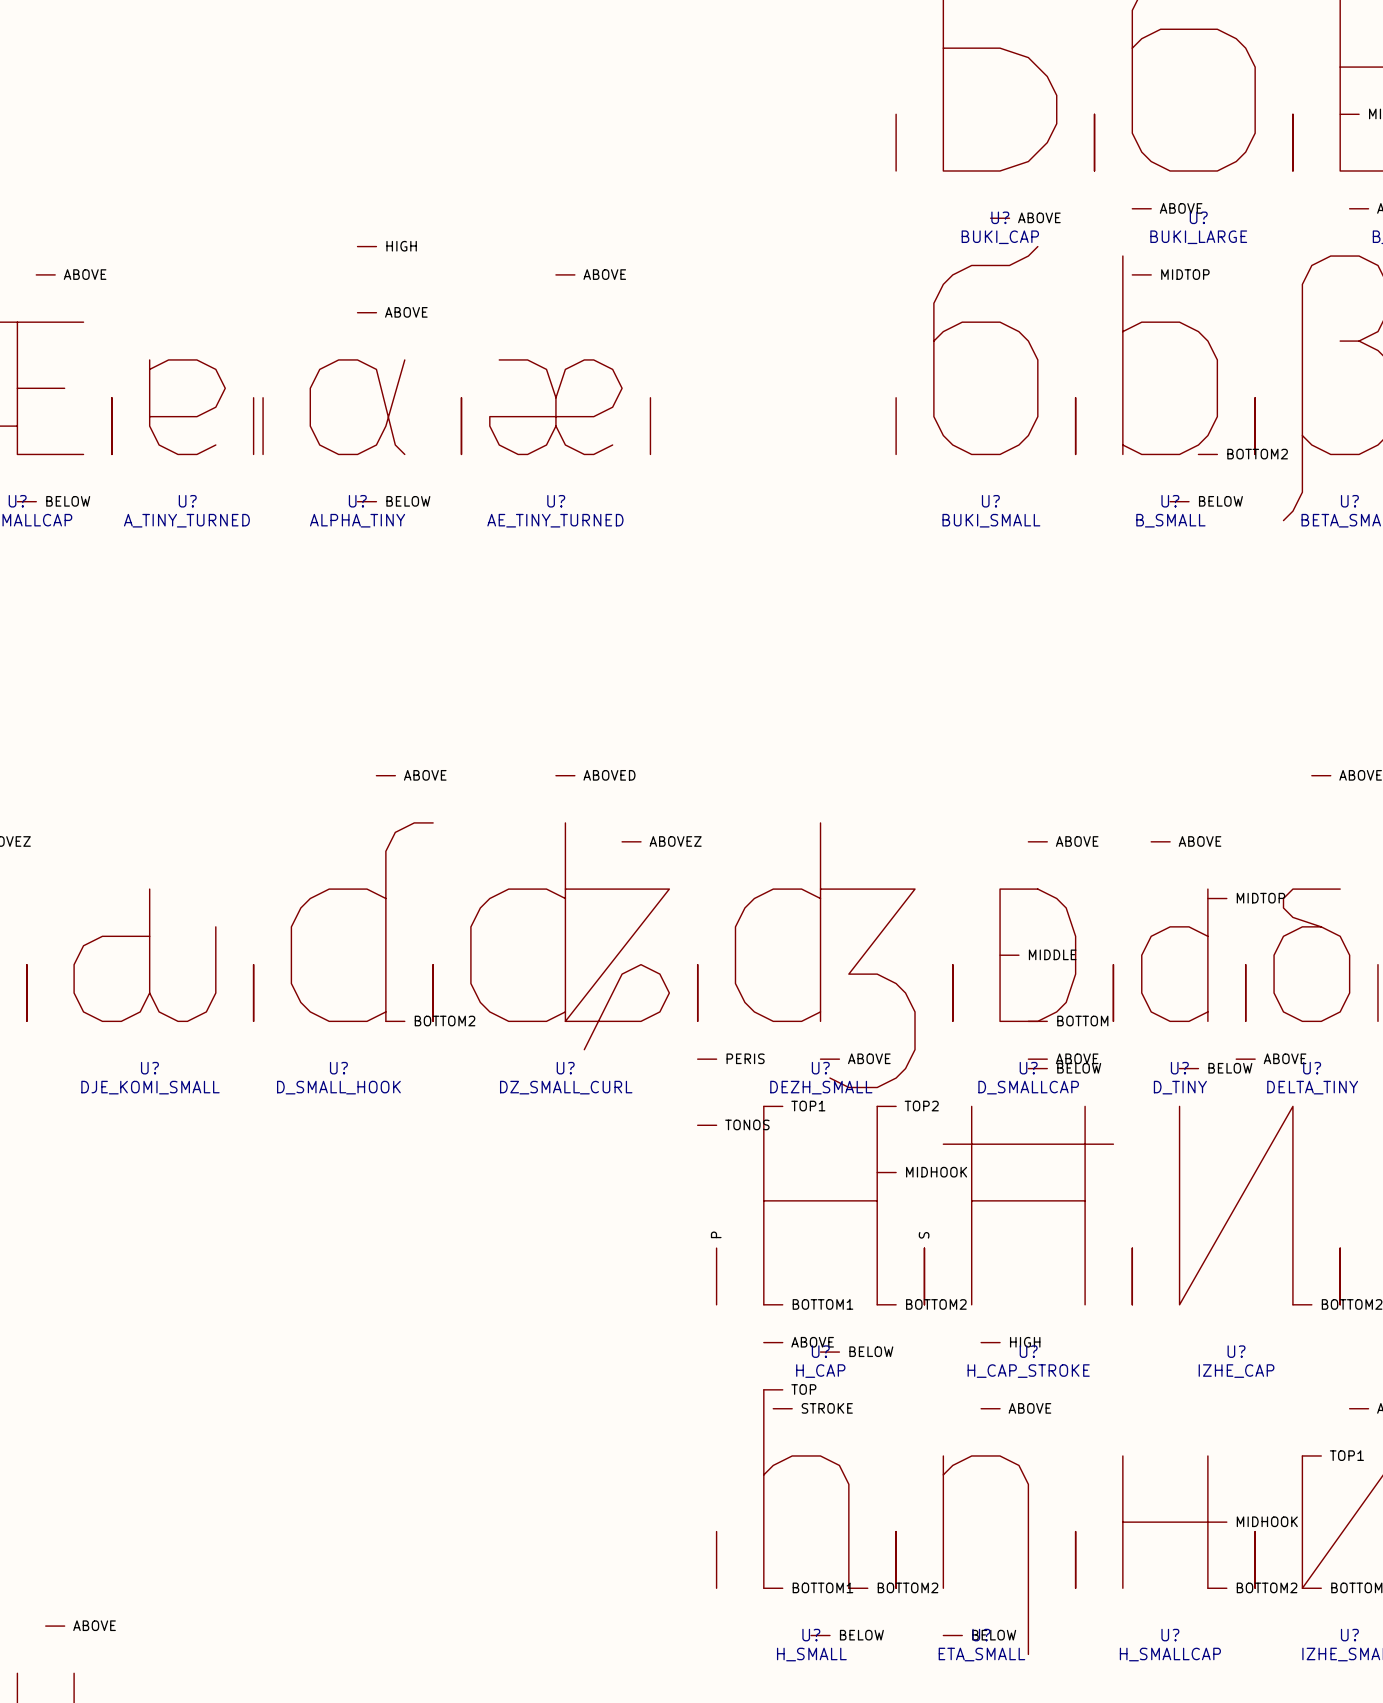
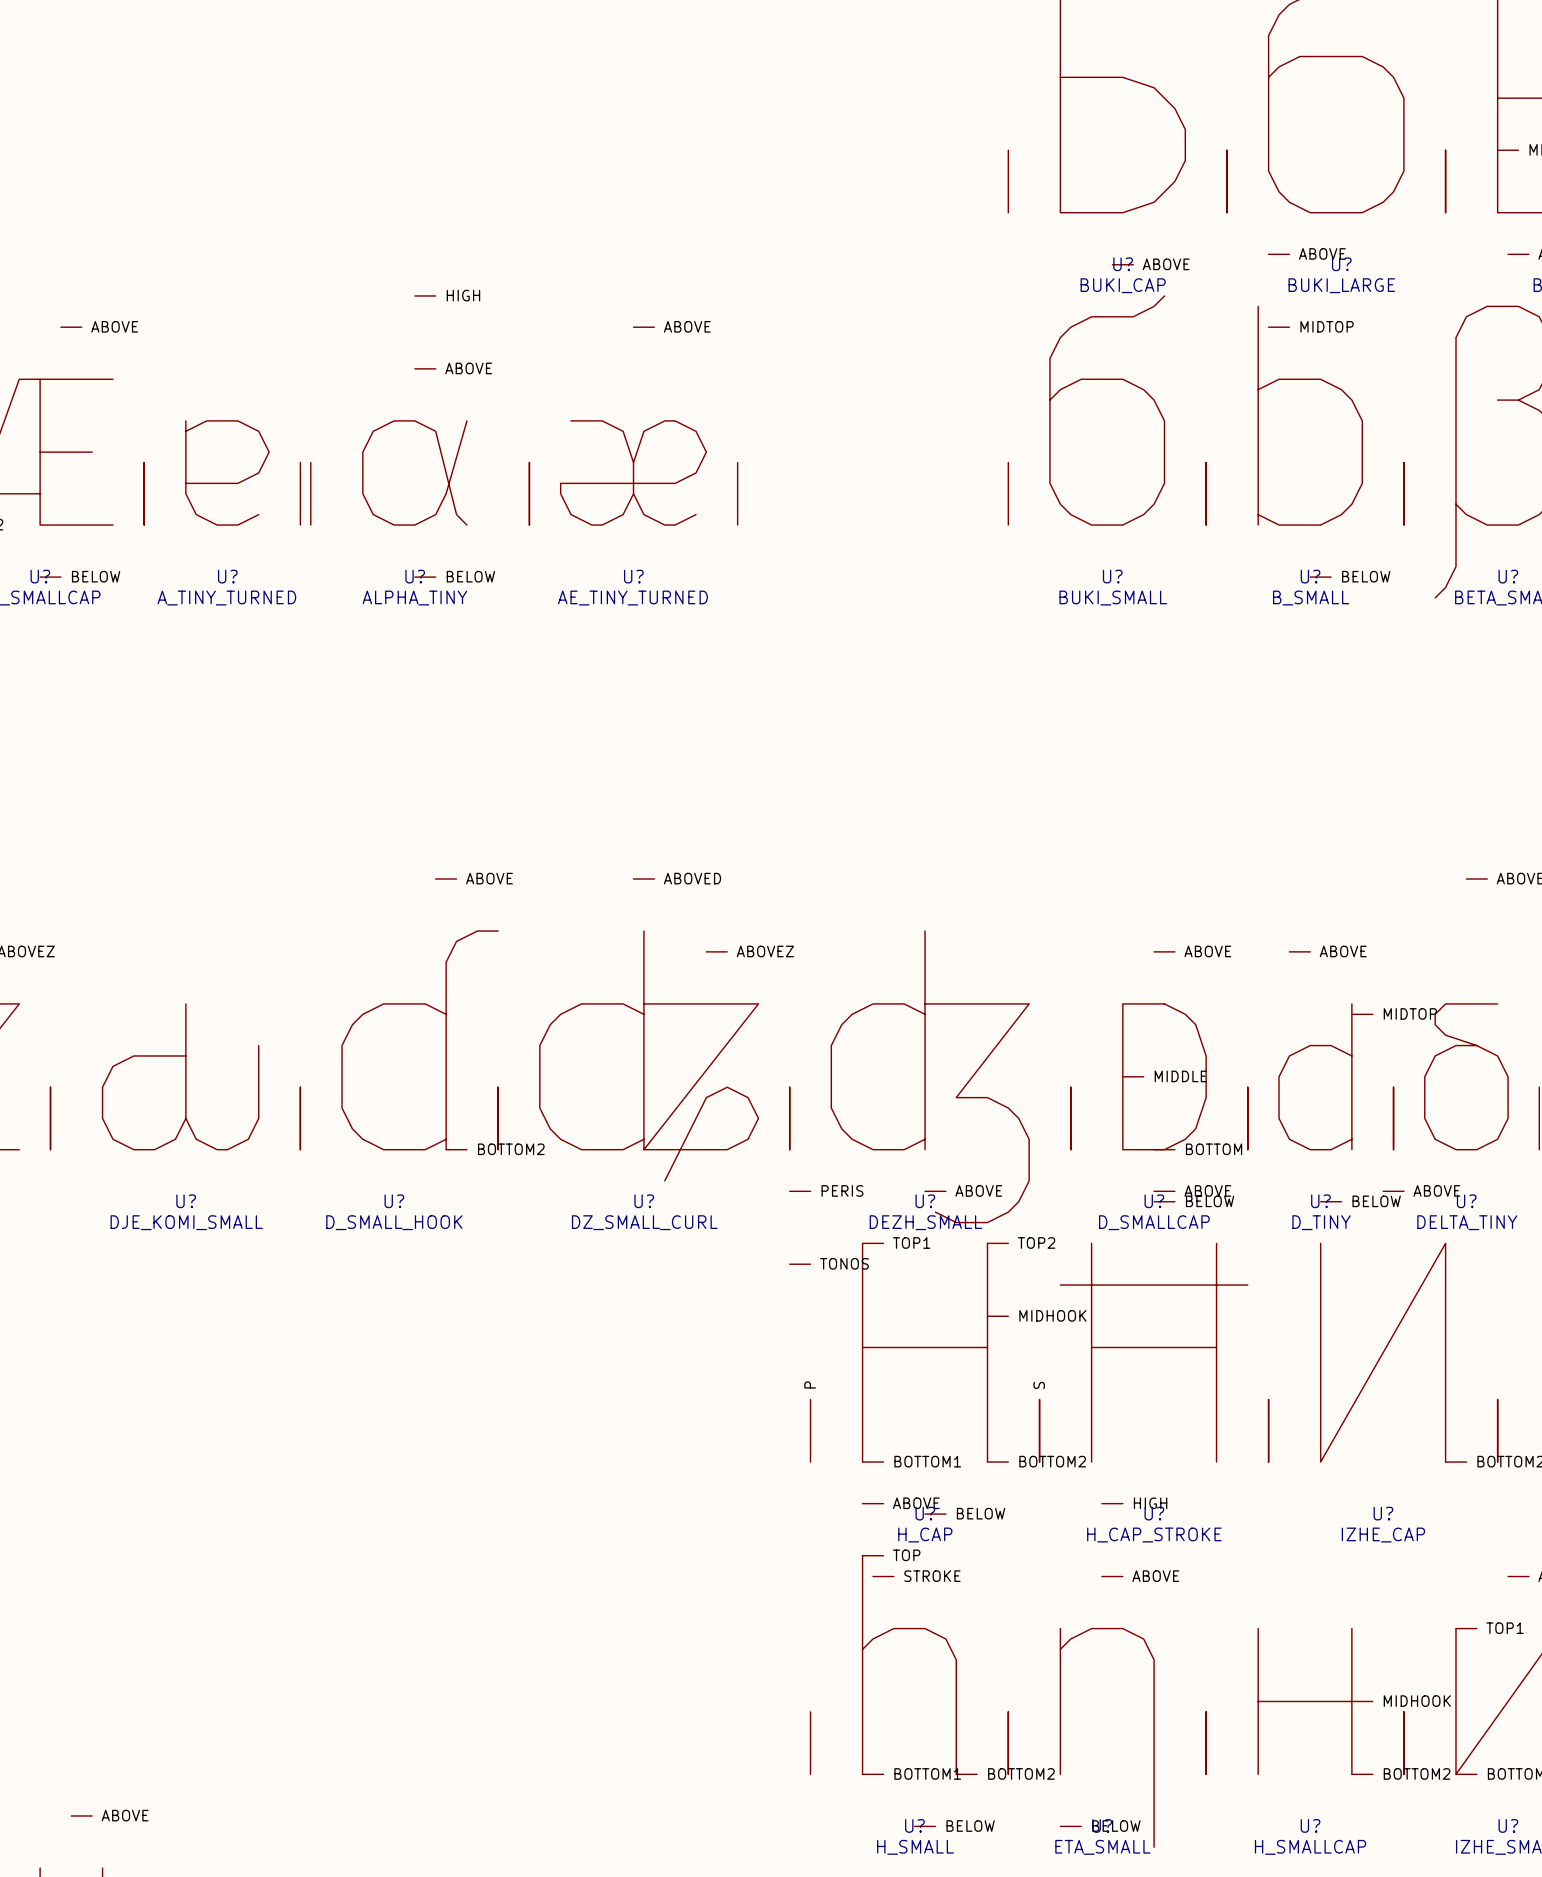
U? symbol: [1075, 208, 1256, 502] -> [1206, 254, 1404, 578]

